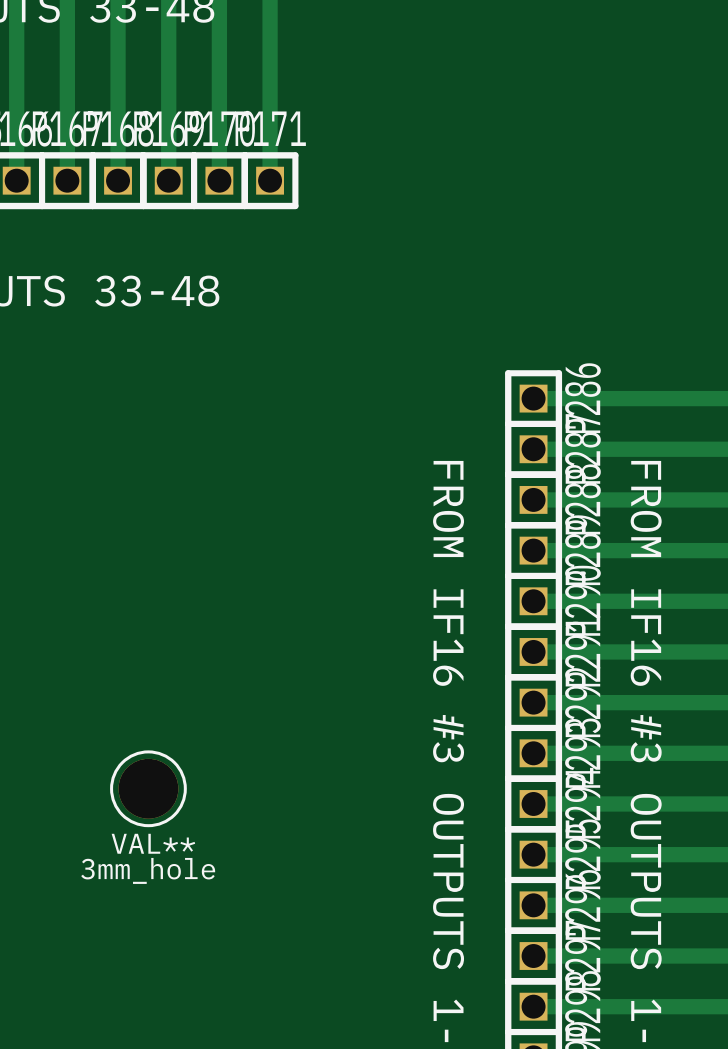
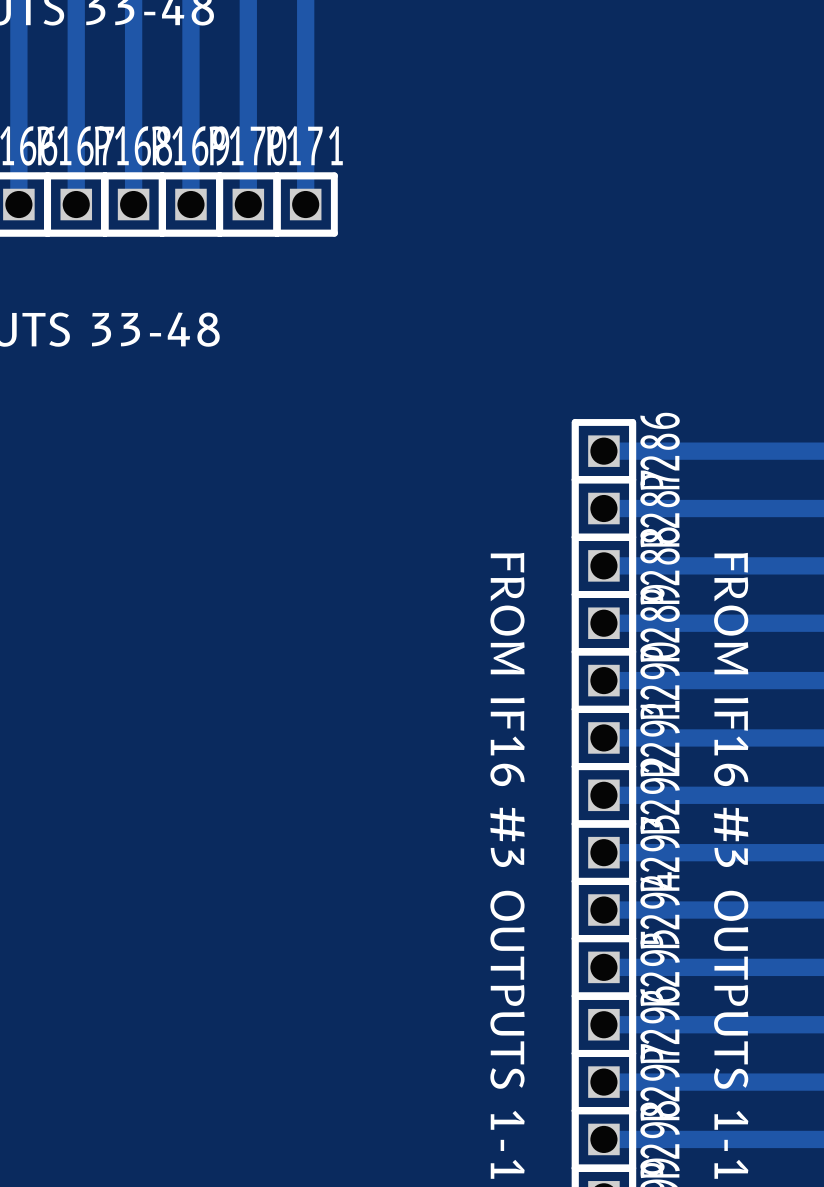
3mm_hole: VAL** (148, 788) -> none

